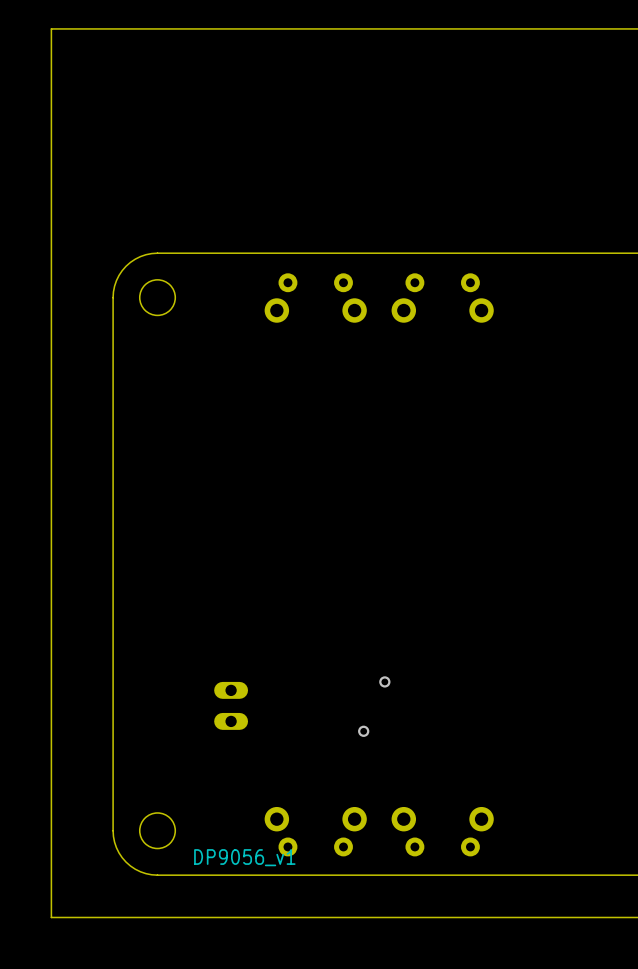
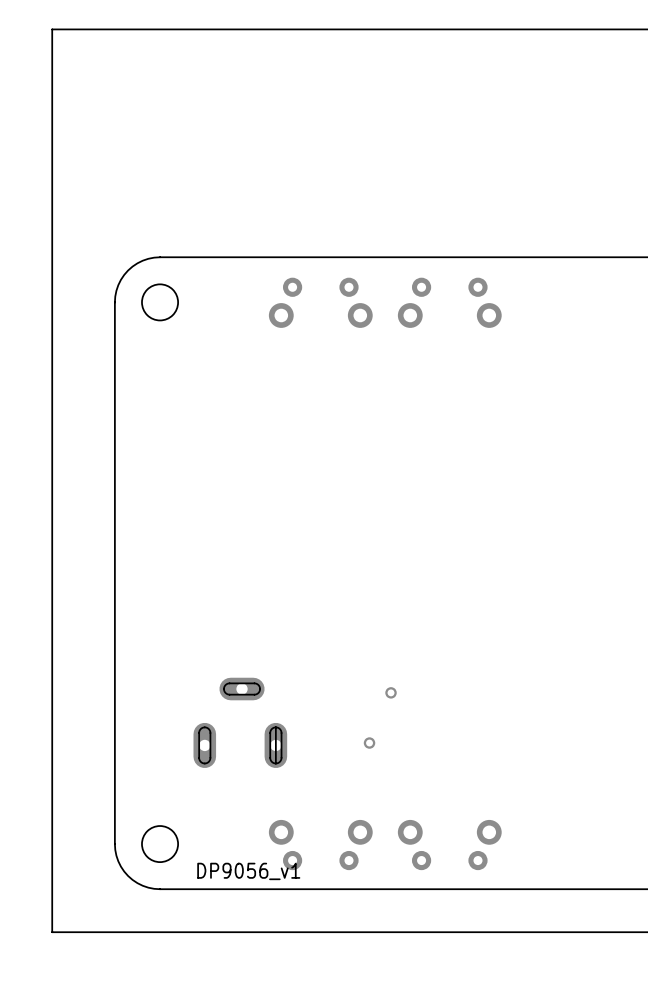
part footprint: [214, 681, 249, 730] -> [193, 677, 288, 769]

